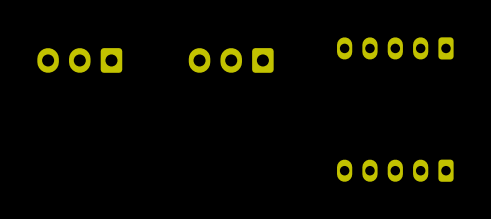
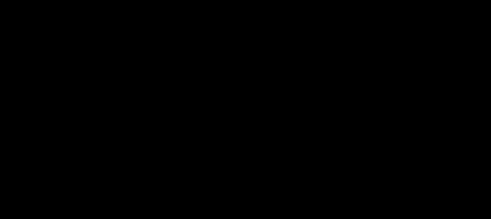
part: (395, 48) -> none
part: (79, 60) -> none
part: (231, 60) -> none
part: (395, 170) -> none

